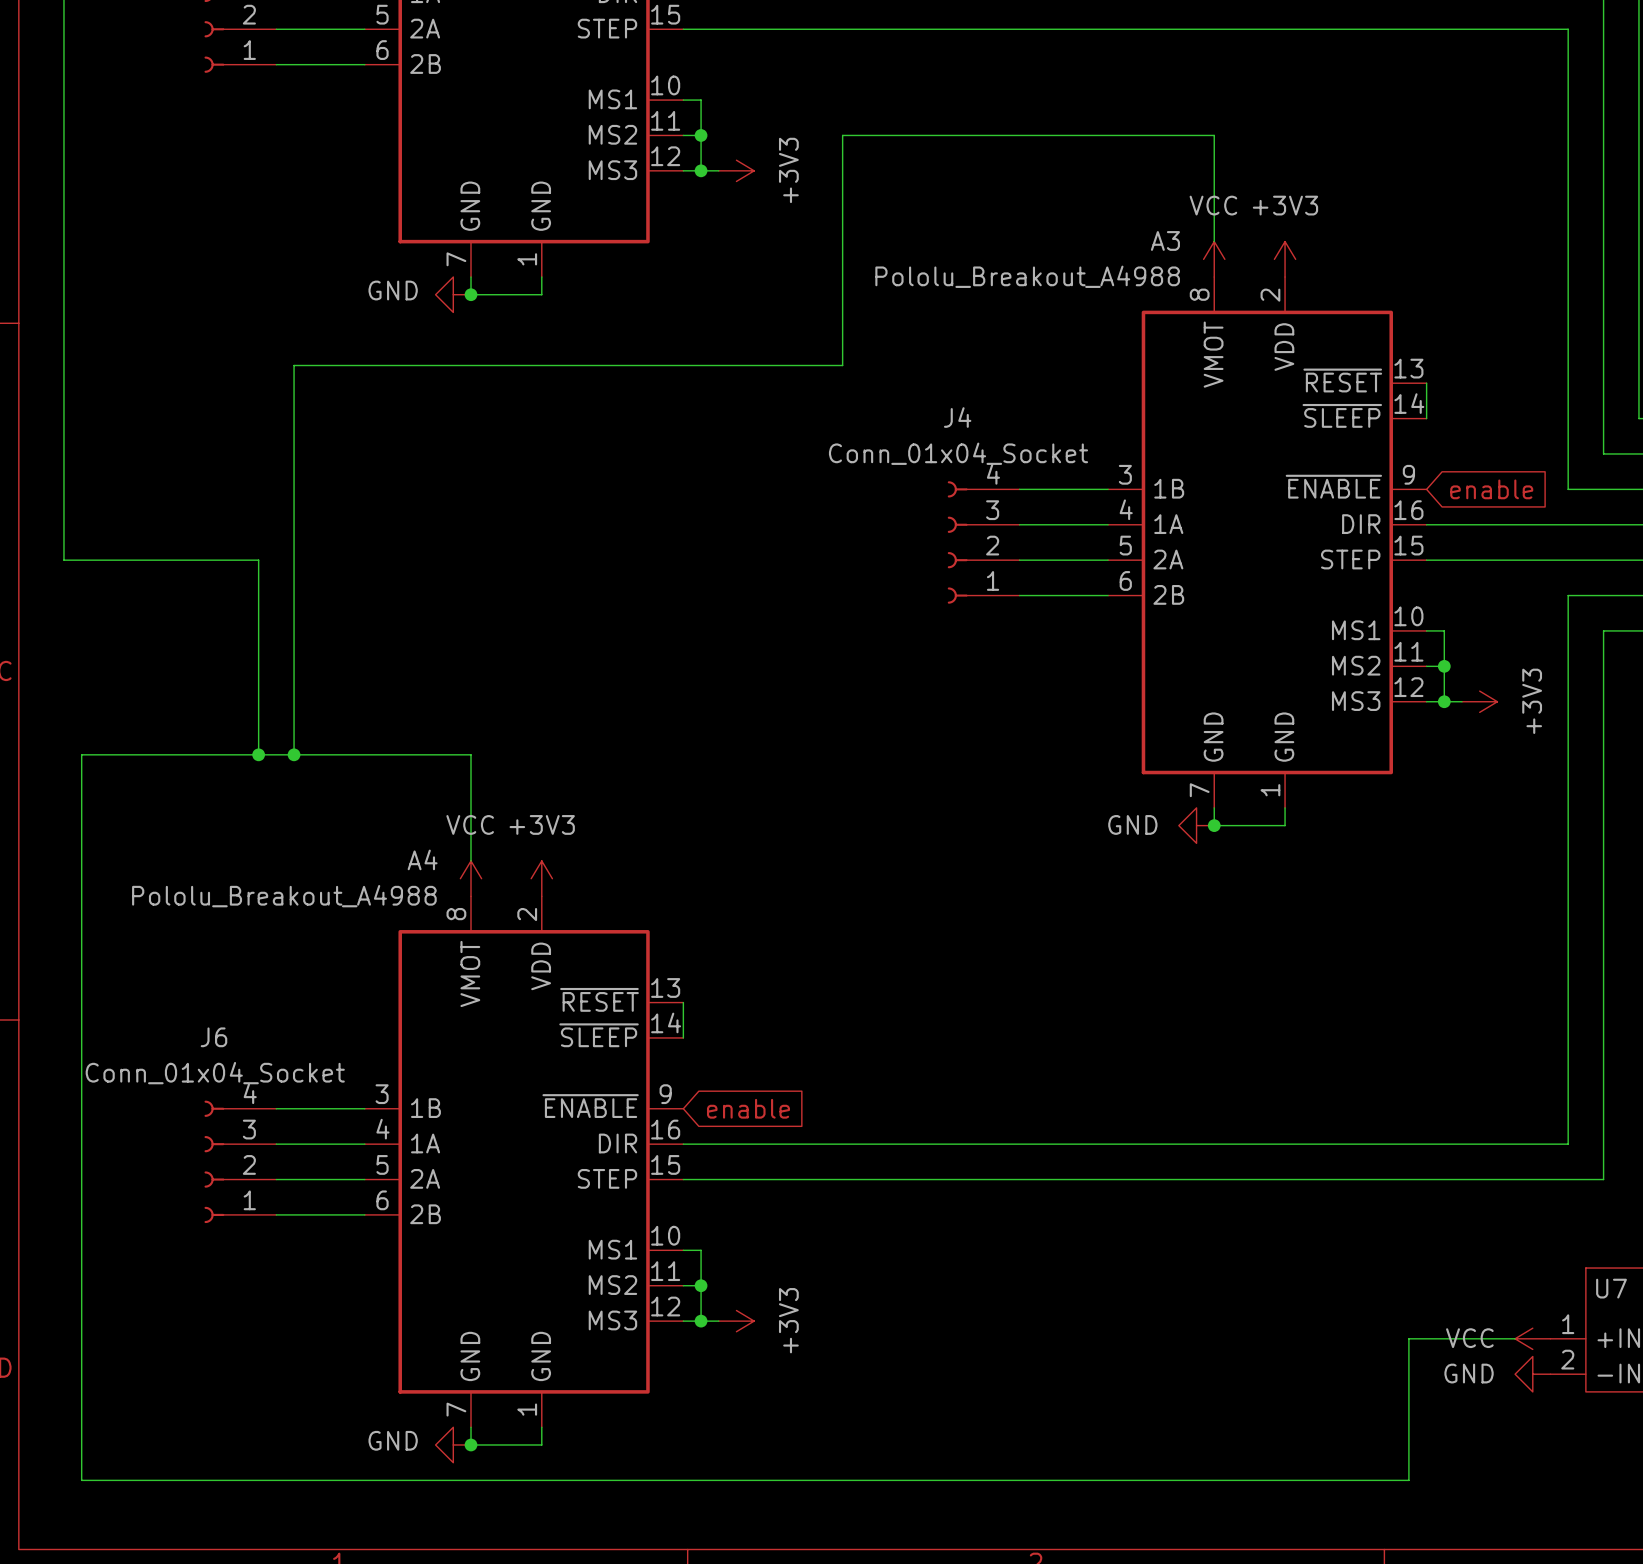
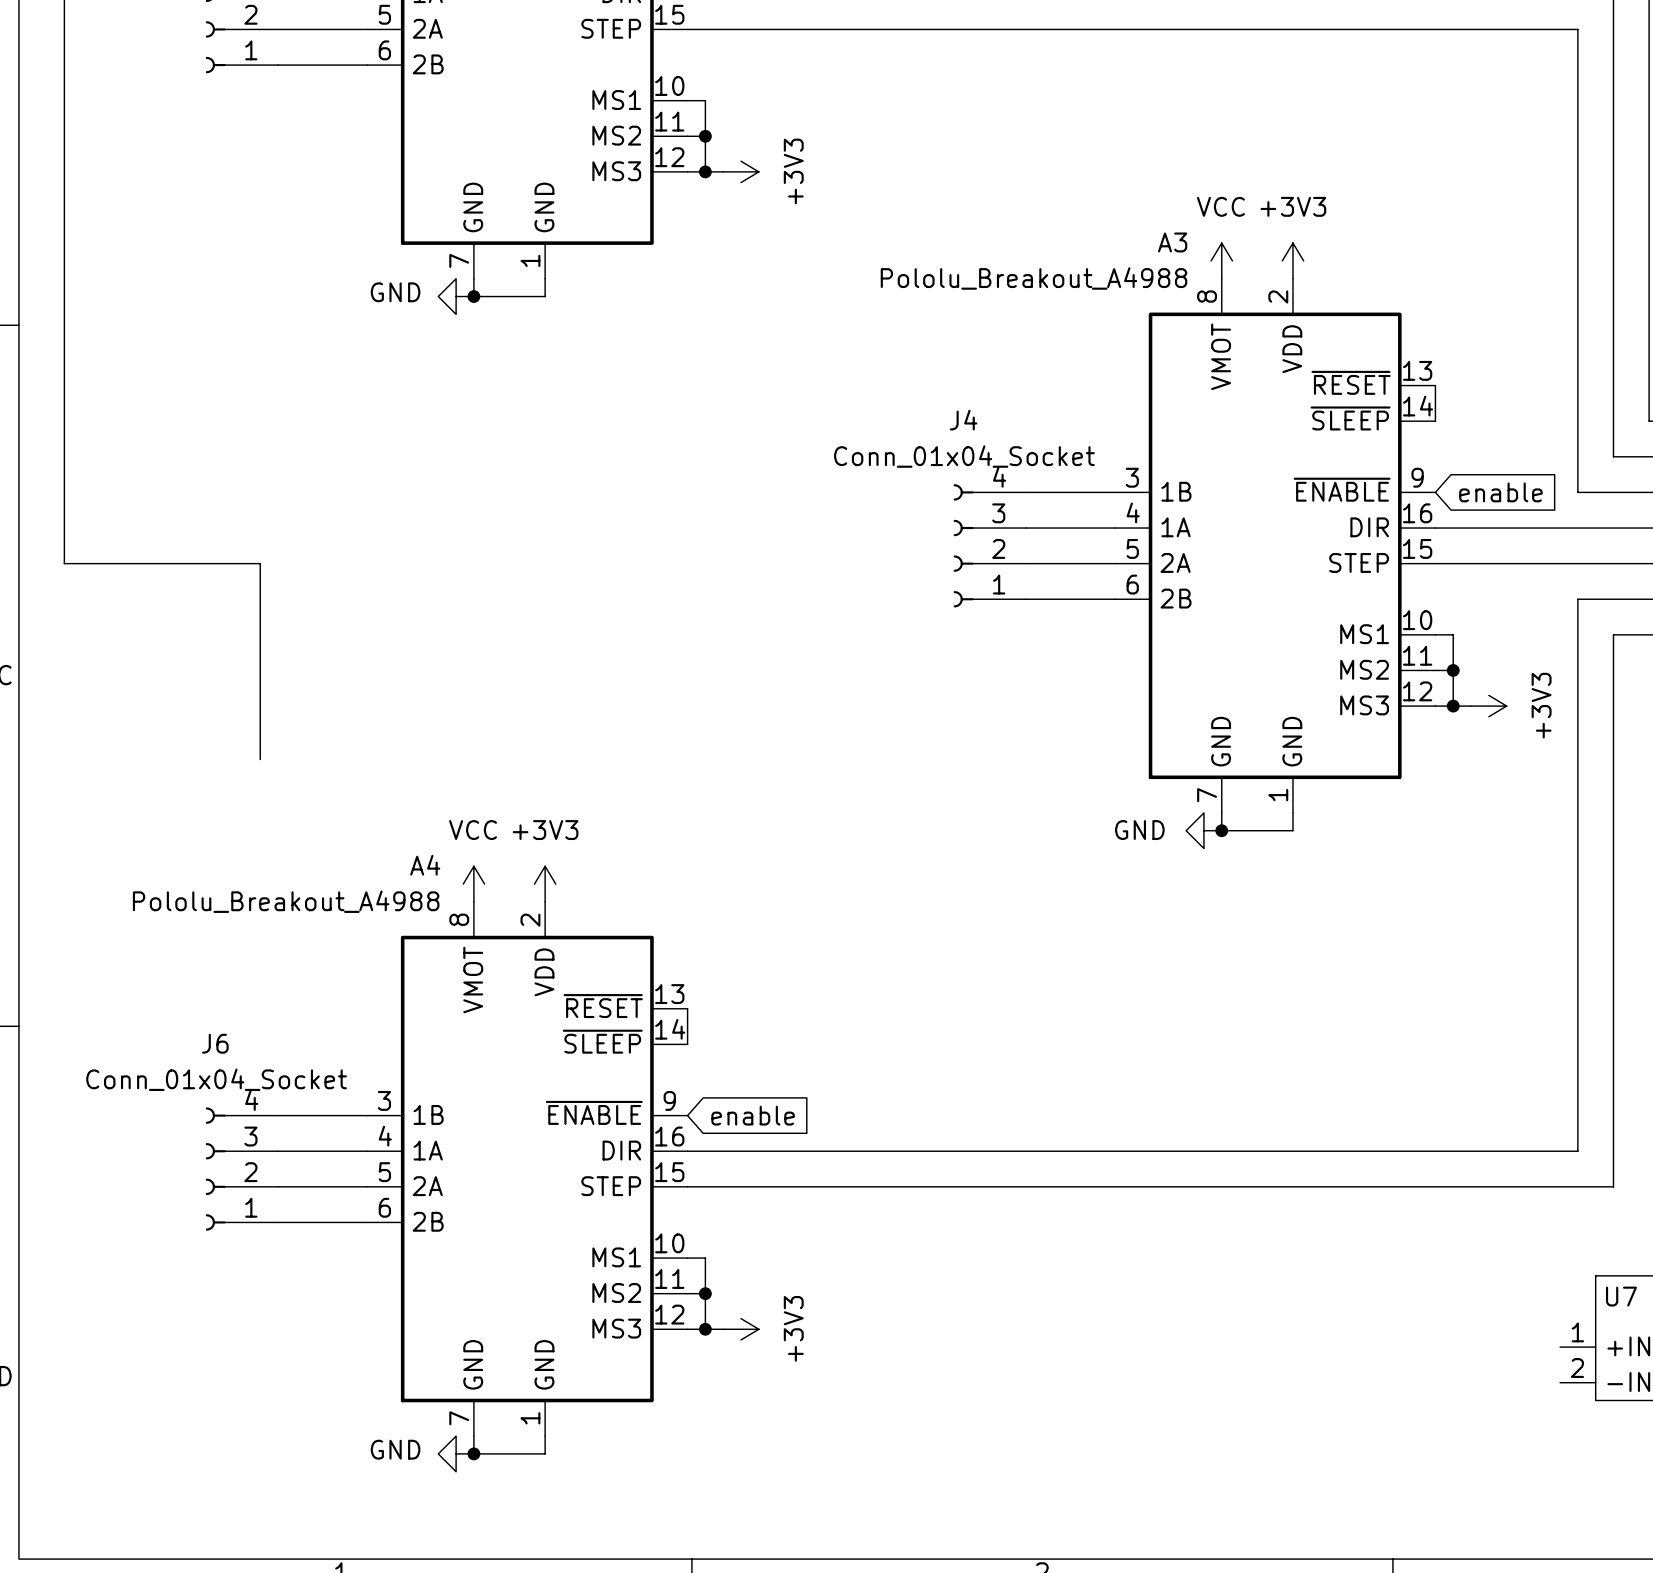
wire: (1214, 241) (1214, 135) (842, 135) (842, 365) (294, 365) (294, 754) -> none
junction: (258, 754) -> none
junction: (294, 754) -> none
wire: (471, 861) (471, 754) (81, 754) (81, 1480) (1408, 1480) (1408, 1338) (1515, 1338) -> none
power symbol: VCC (1532, 1338) -> none
power symbol: GND (1532, 1374) -> none

